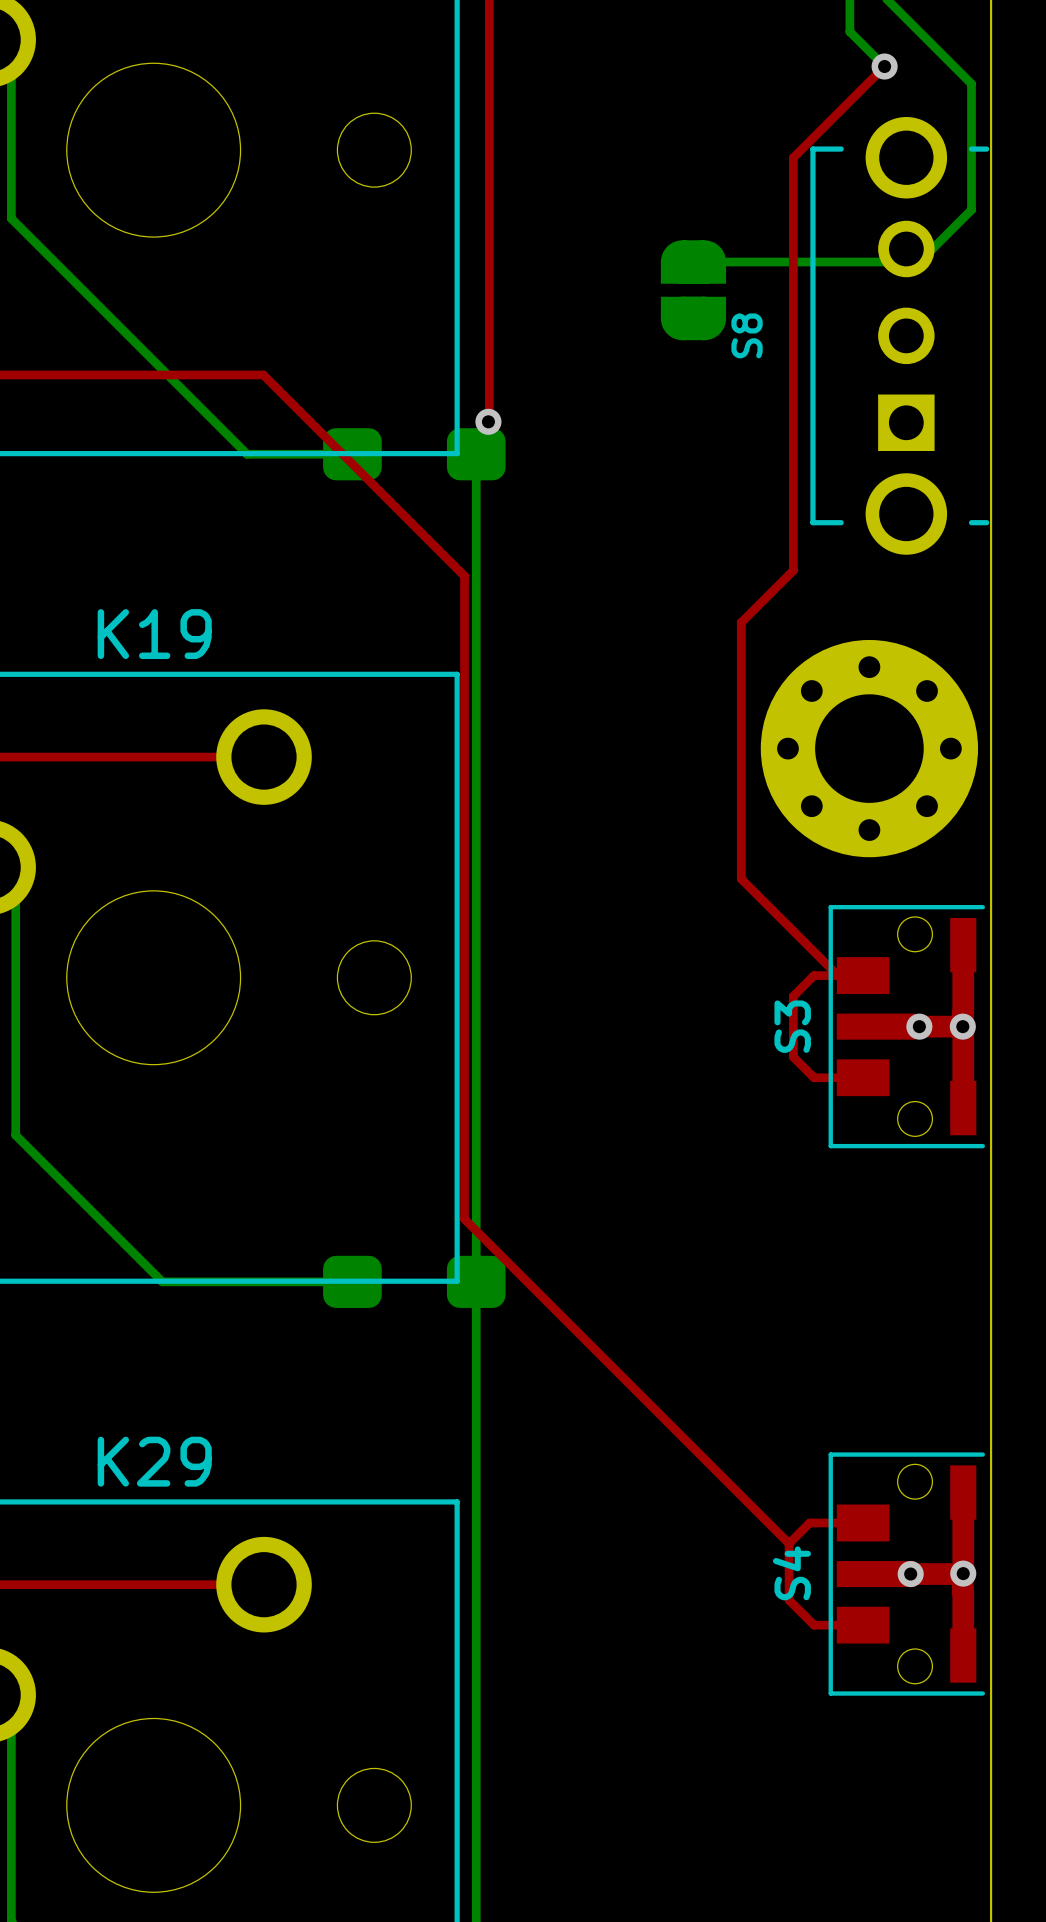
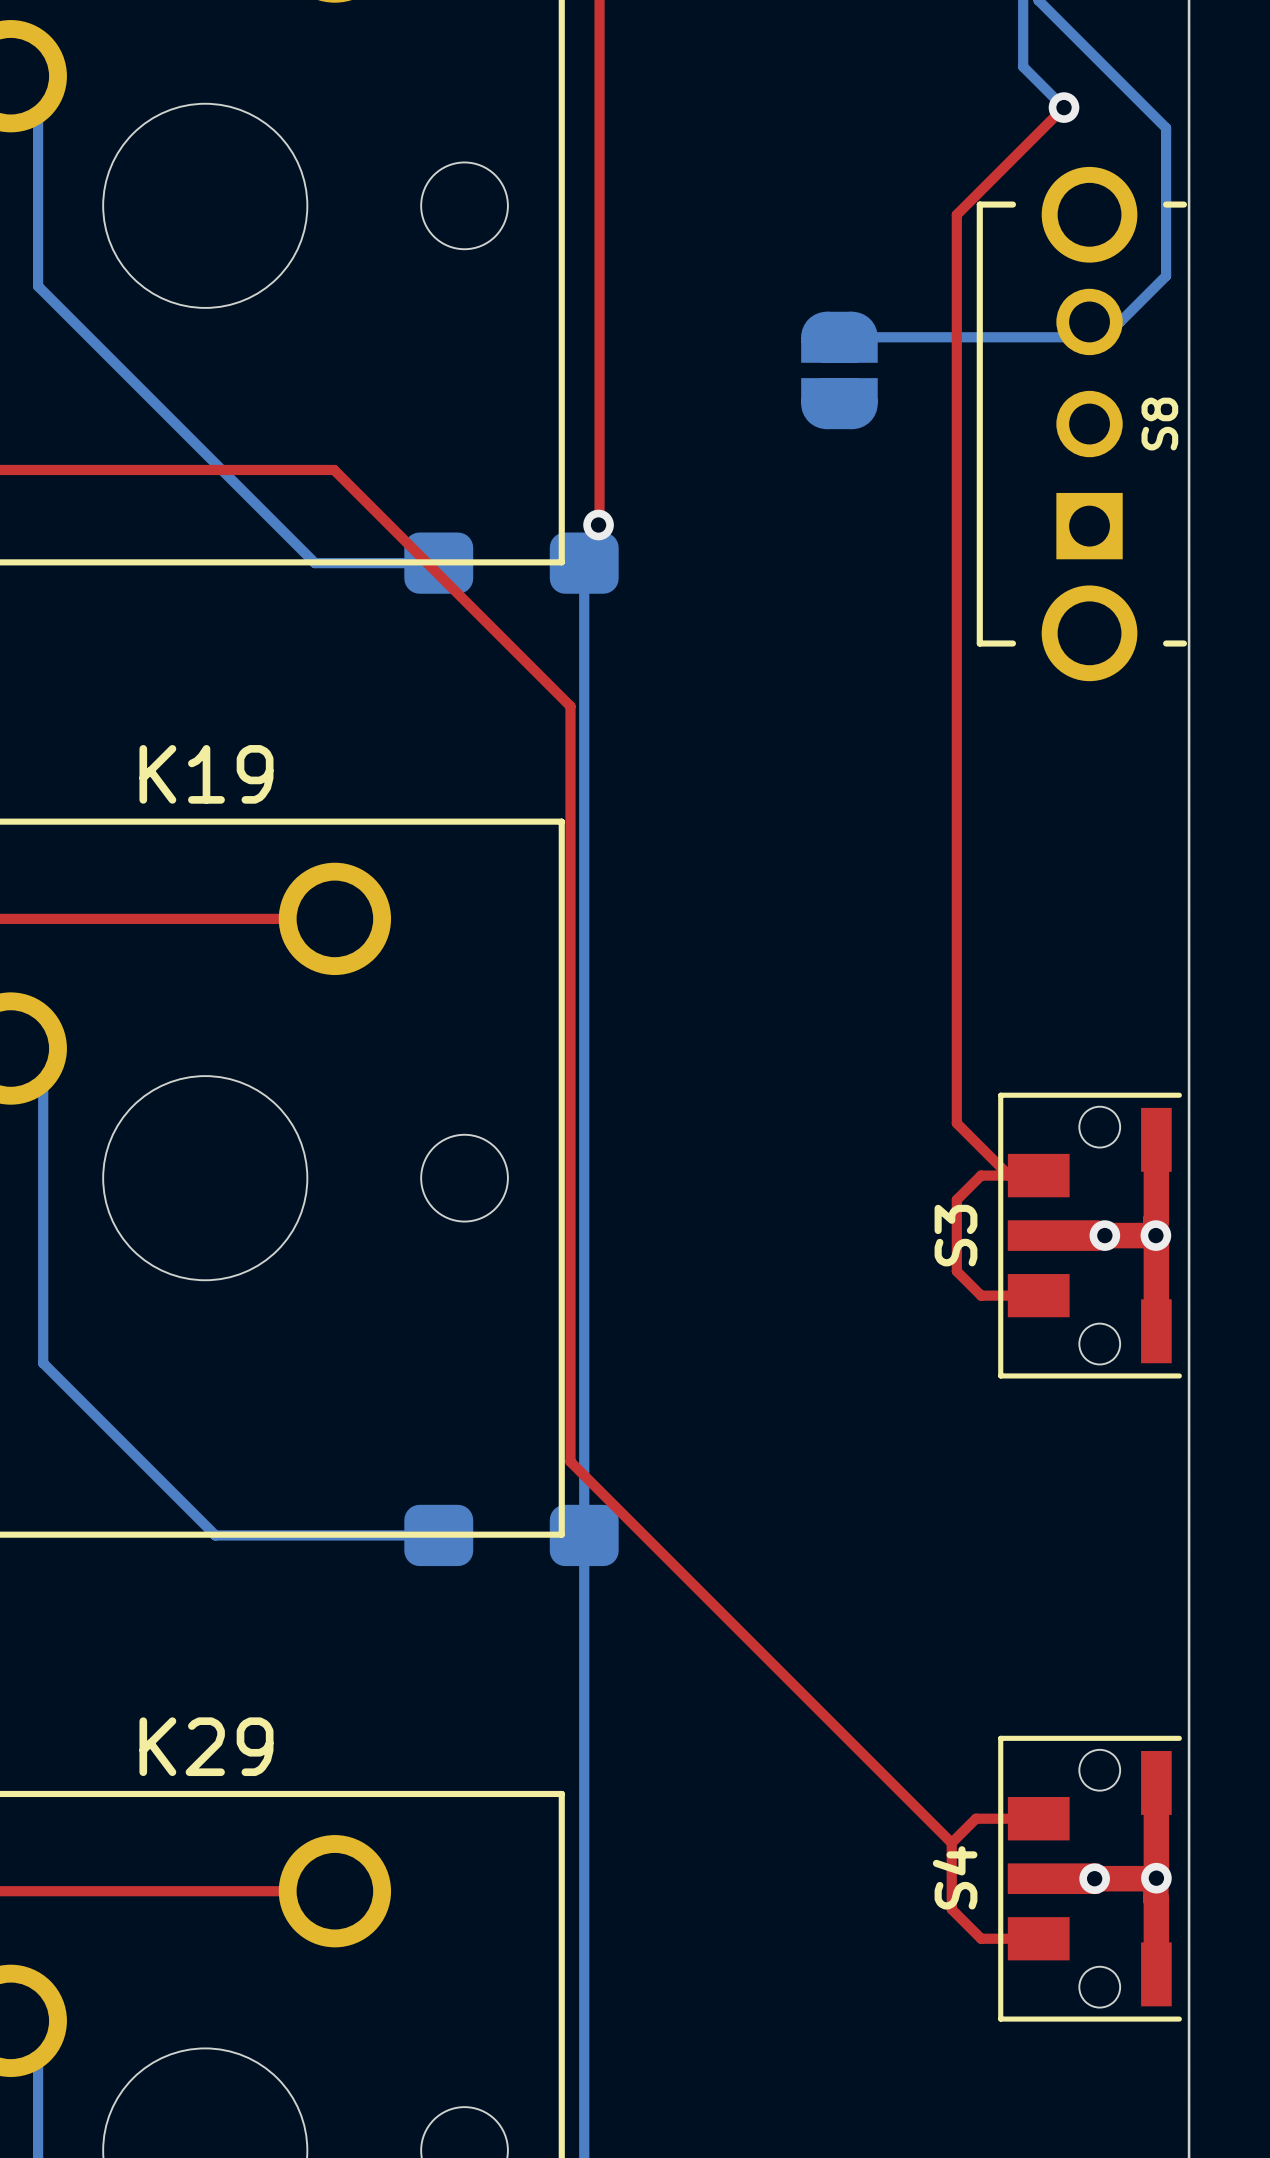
S8 name position: S8 (747, 335) -> S8 (1159, 424)
top track: (793, 570) (741, 622) (741, 878) (793, 931) -> (956, 699) (956, 1123)
part: (869, 748) -> none

